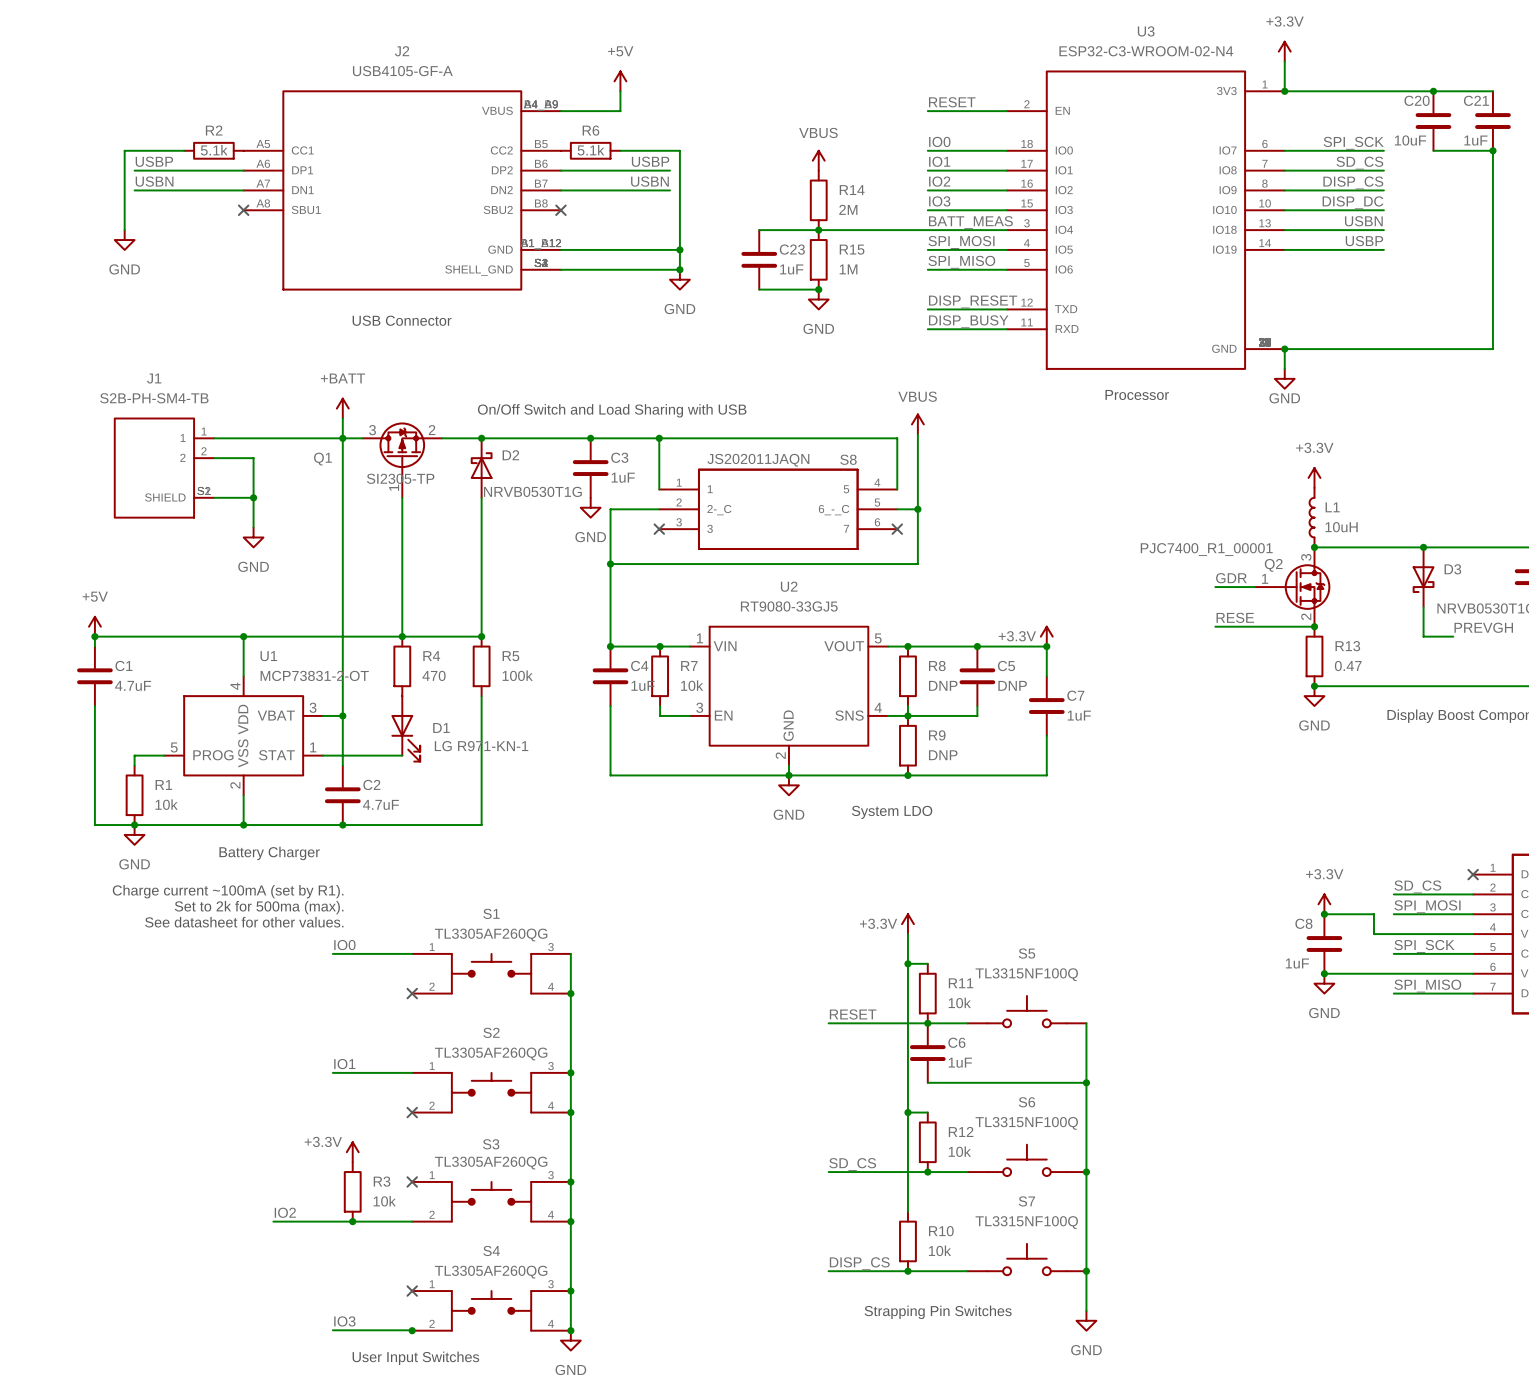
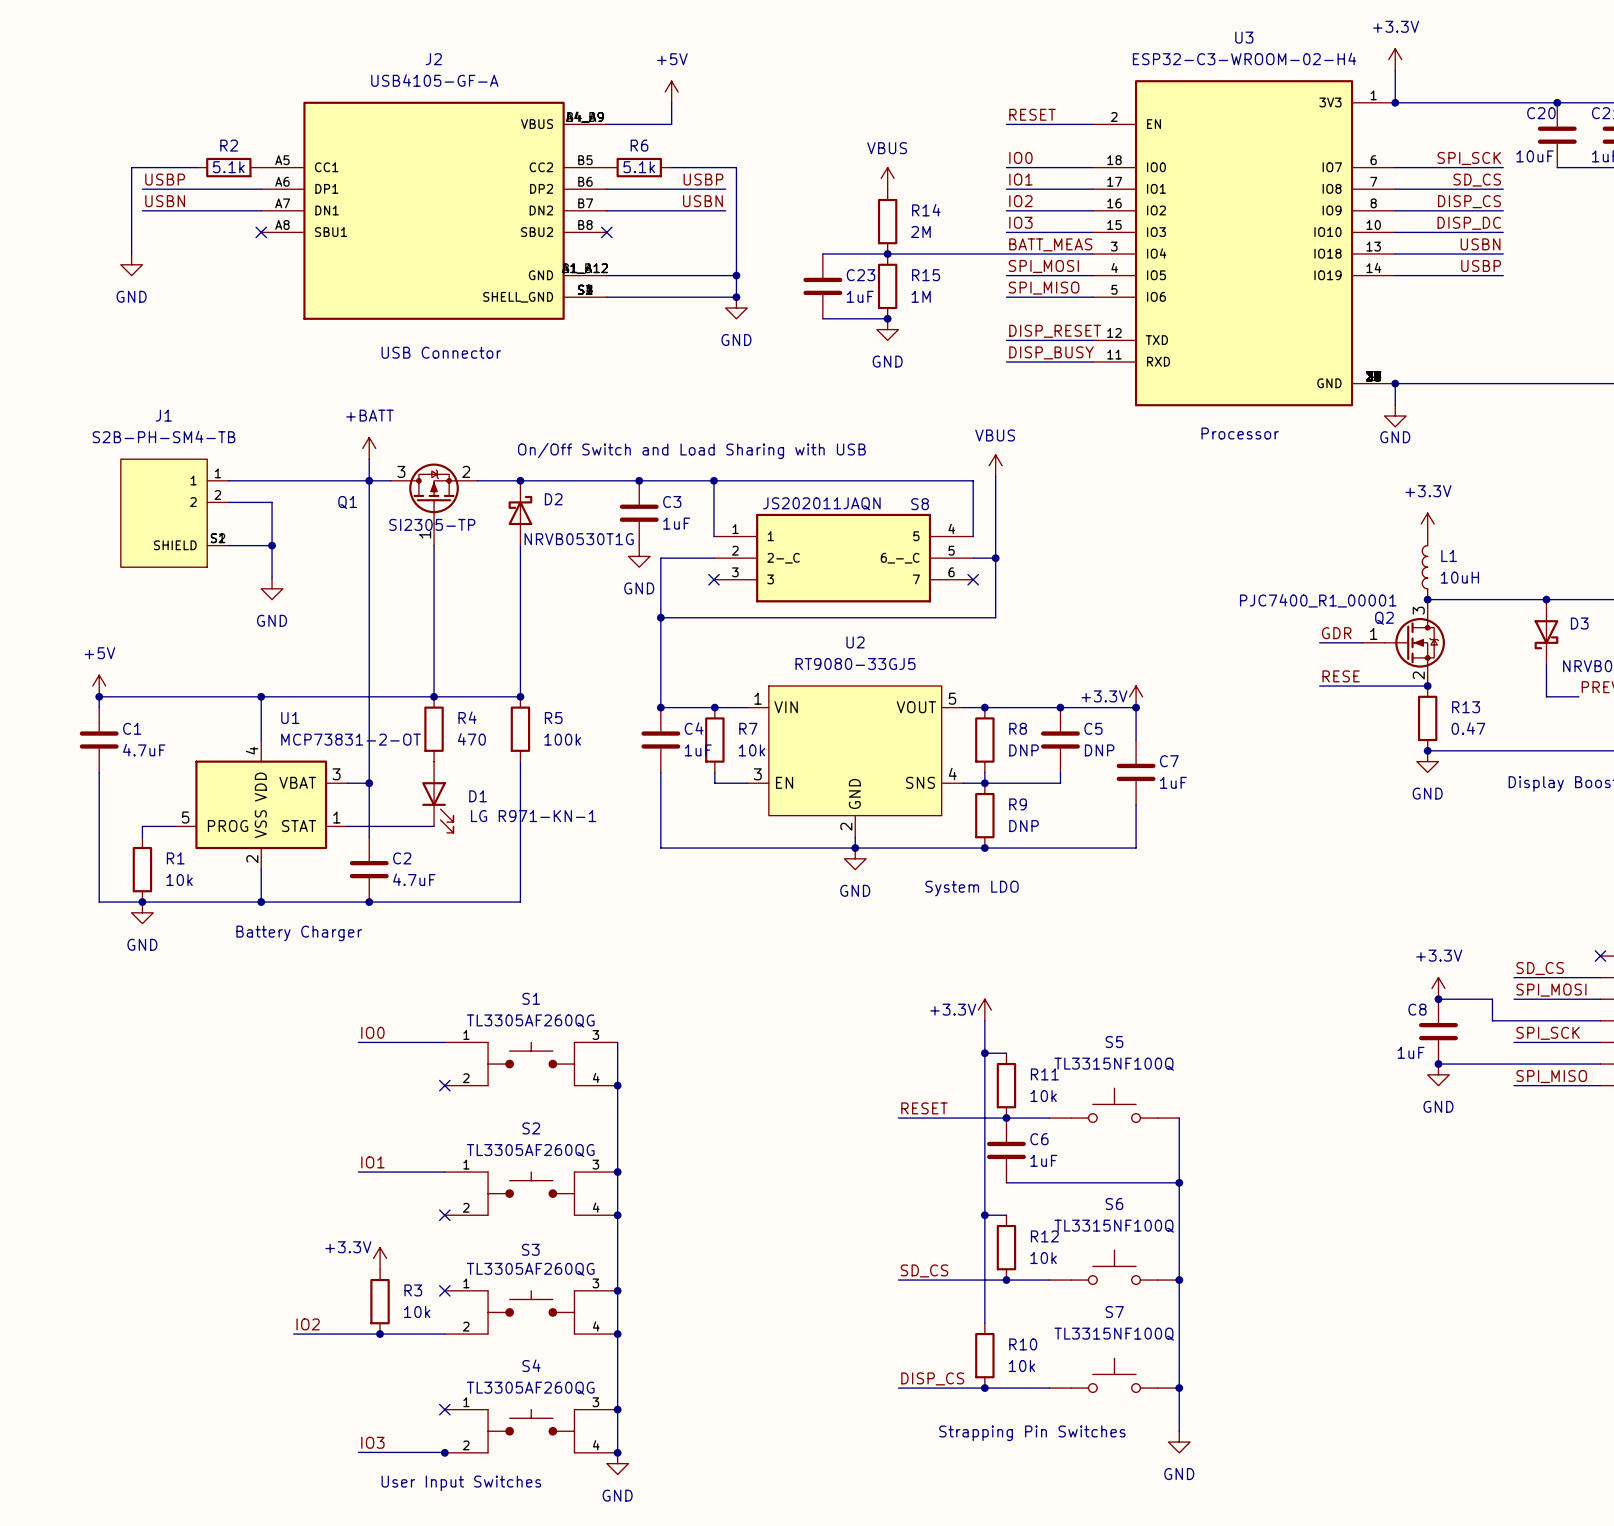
U3 value: ESP32-C3-WROOM-02-N4 (1146, 51) -> ESP32-C3-WROOM-02-H4 (1244, 58)
text: Charge current ~100mA (set by R1). (228, 891) -> none
text: Set to 2k for 500ma (max). (259, 907) -> none
text: See datasheet for other values. (244, 922) -> none

